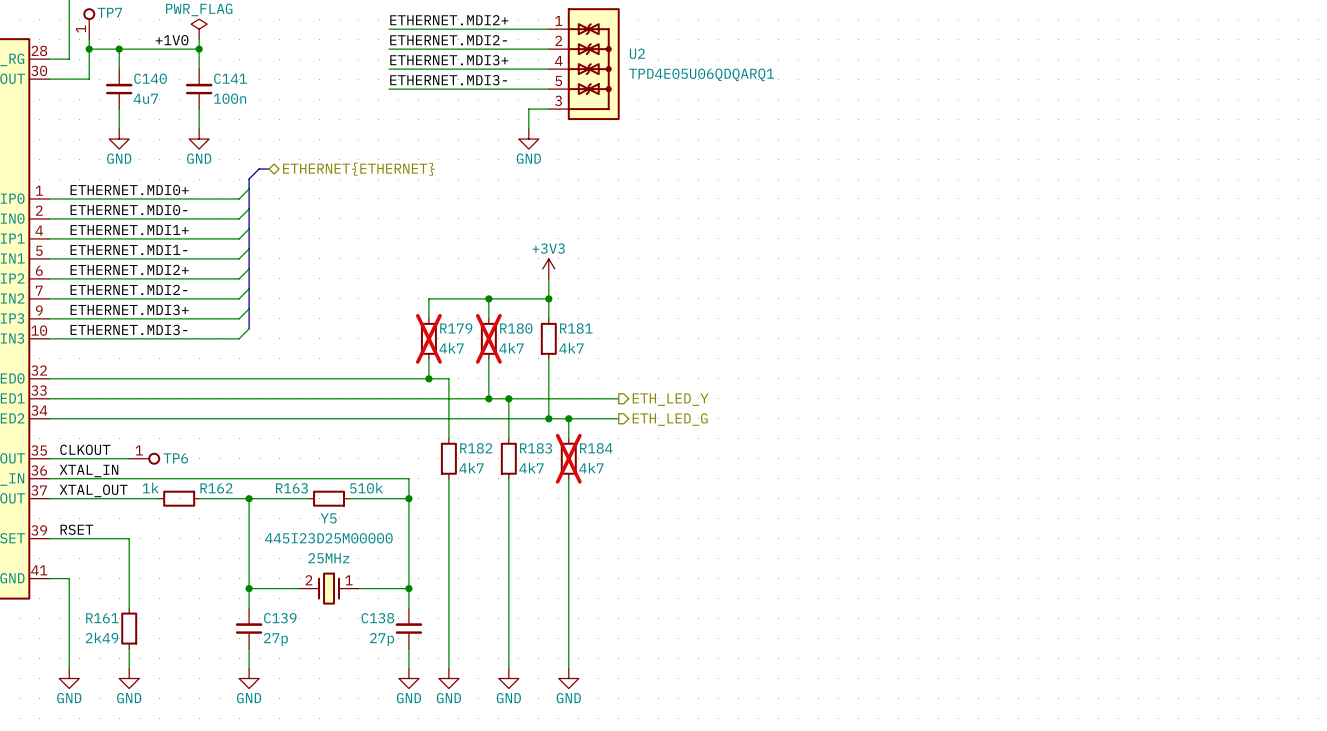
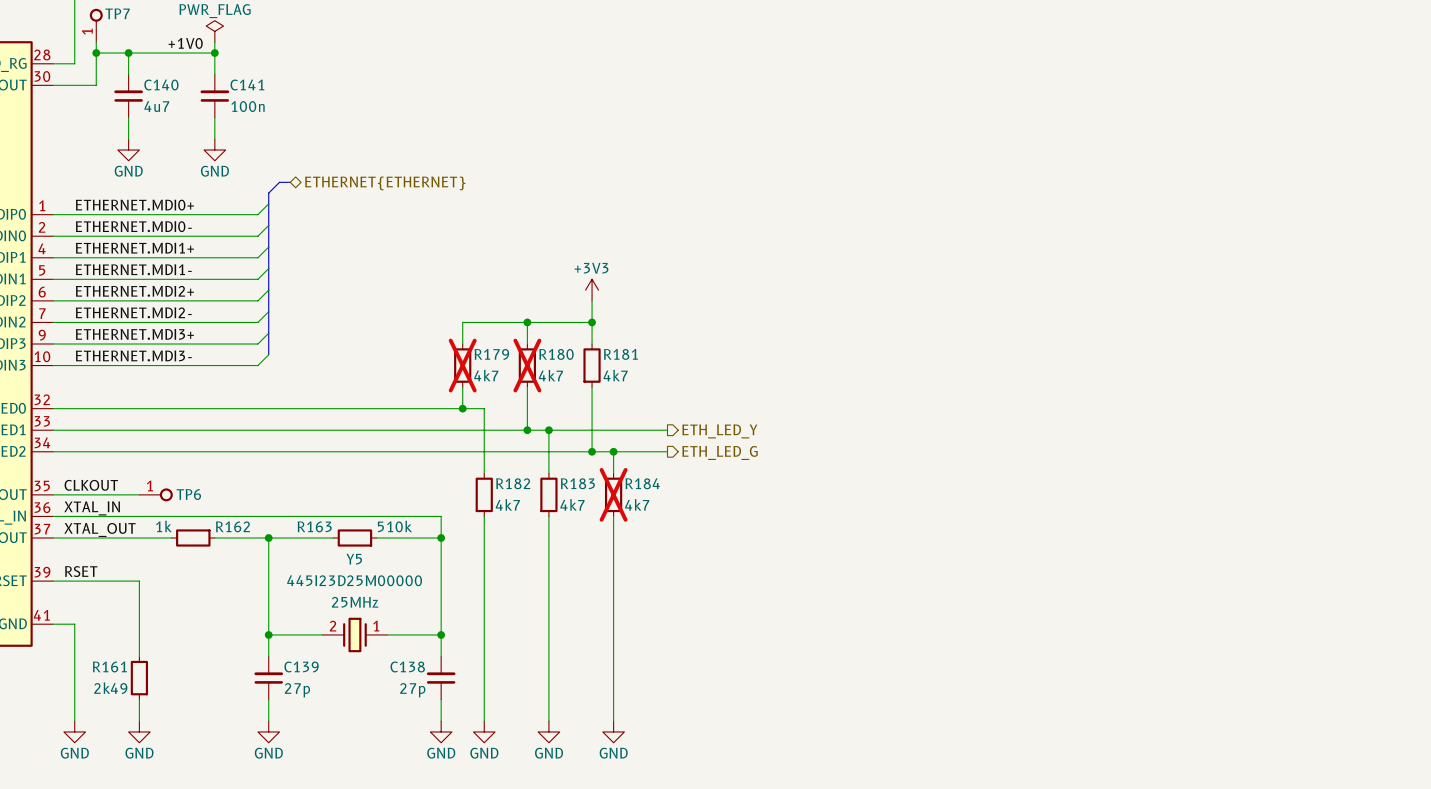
label: ETHERNET.MDI2+ (449, 20) -> none
wire: (388, 29) (548, 29) -> none
label: ETHERNET.MDI2- (448, 40) -> none
wire: (388, 49) (548, 49) -> none
label: ETHERNET.MDI3+ (449, 60) -> none
U2: (584, 64) -> none
wire: (388, 69) (548, 69) -> none
label: ETHERNET.MDI3- (448, 80) -> none
wire: (388, 89) (548, 89) -> none
wire: (548, 109) (528, 109) (528, 129) -> none
power symbol: GND (528, 139) -> none

